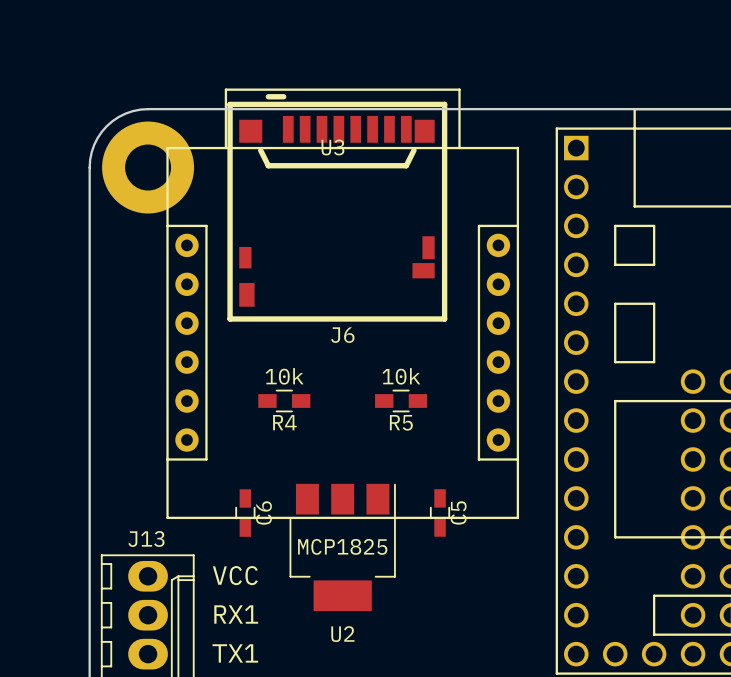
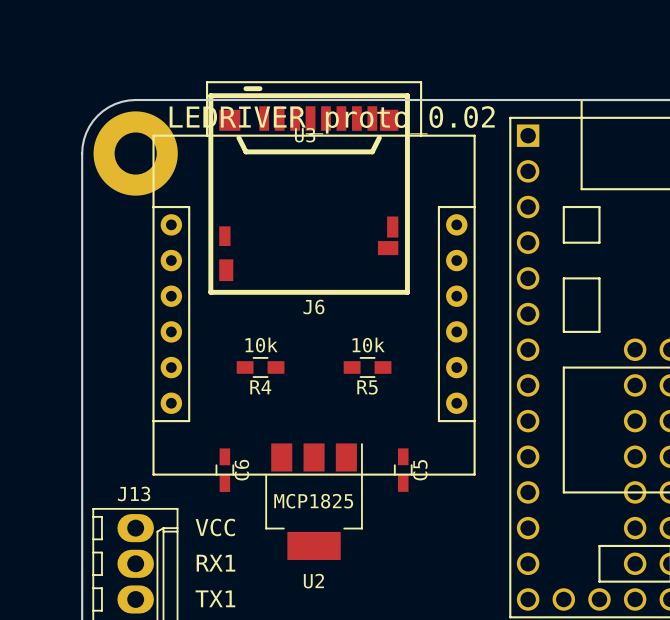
text: none -> LEDRIVER_proto_0.02 (332, 120)

